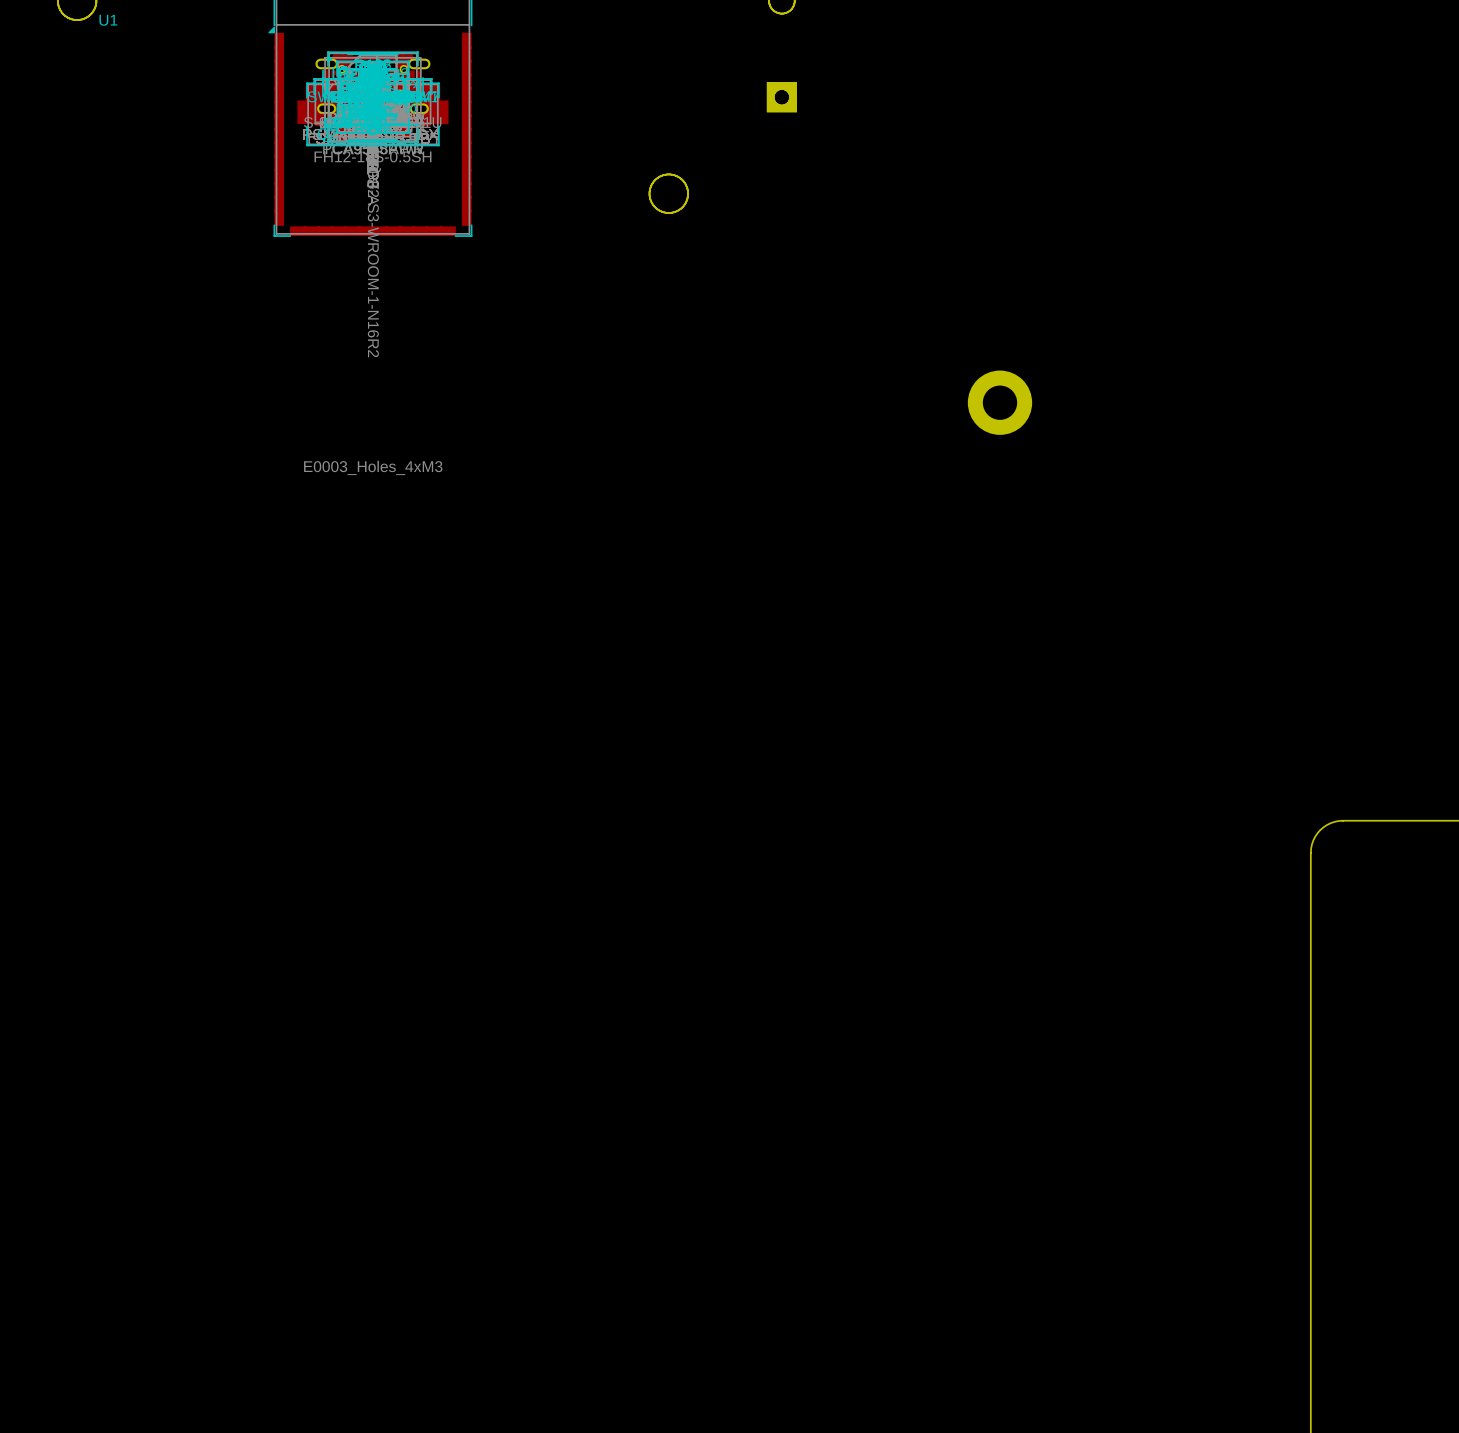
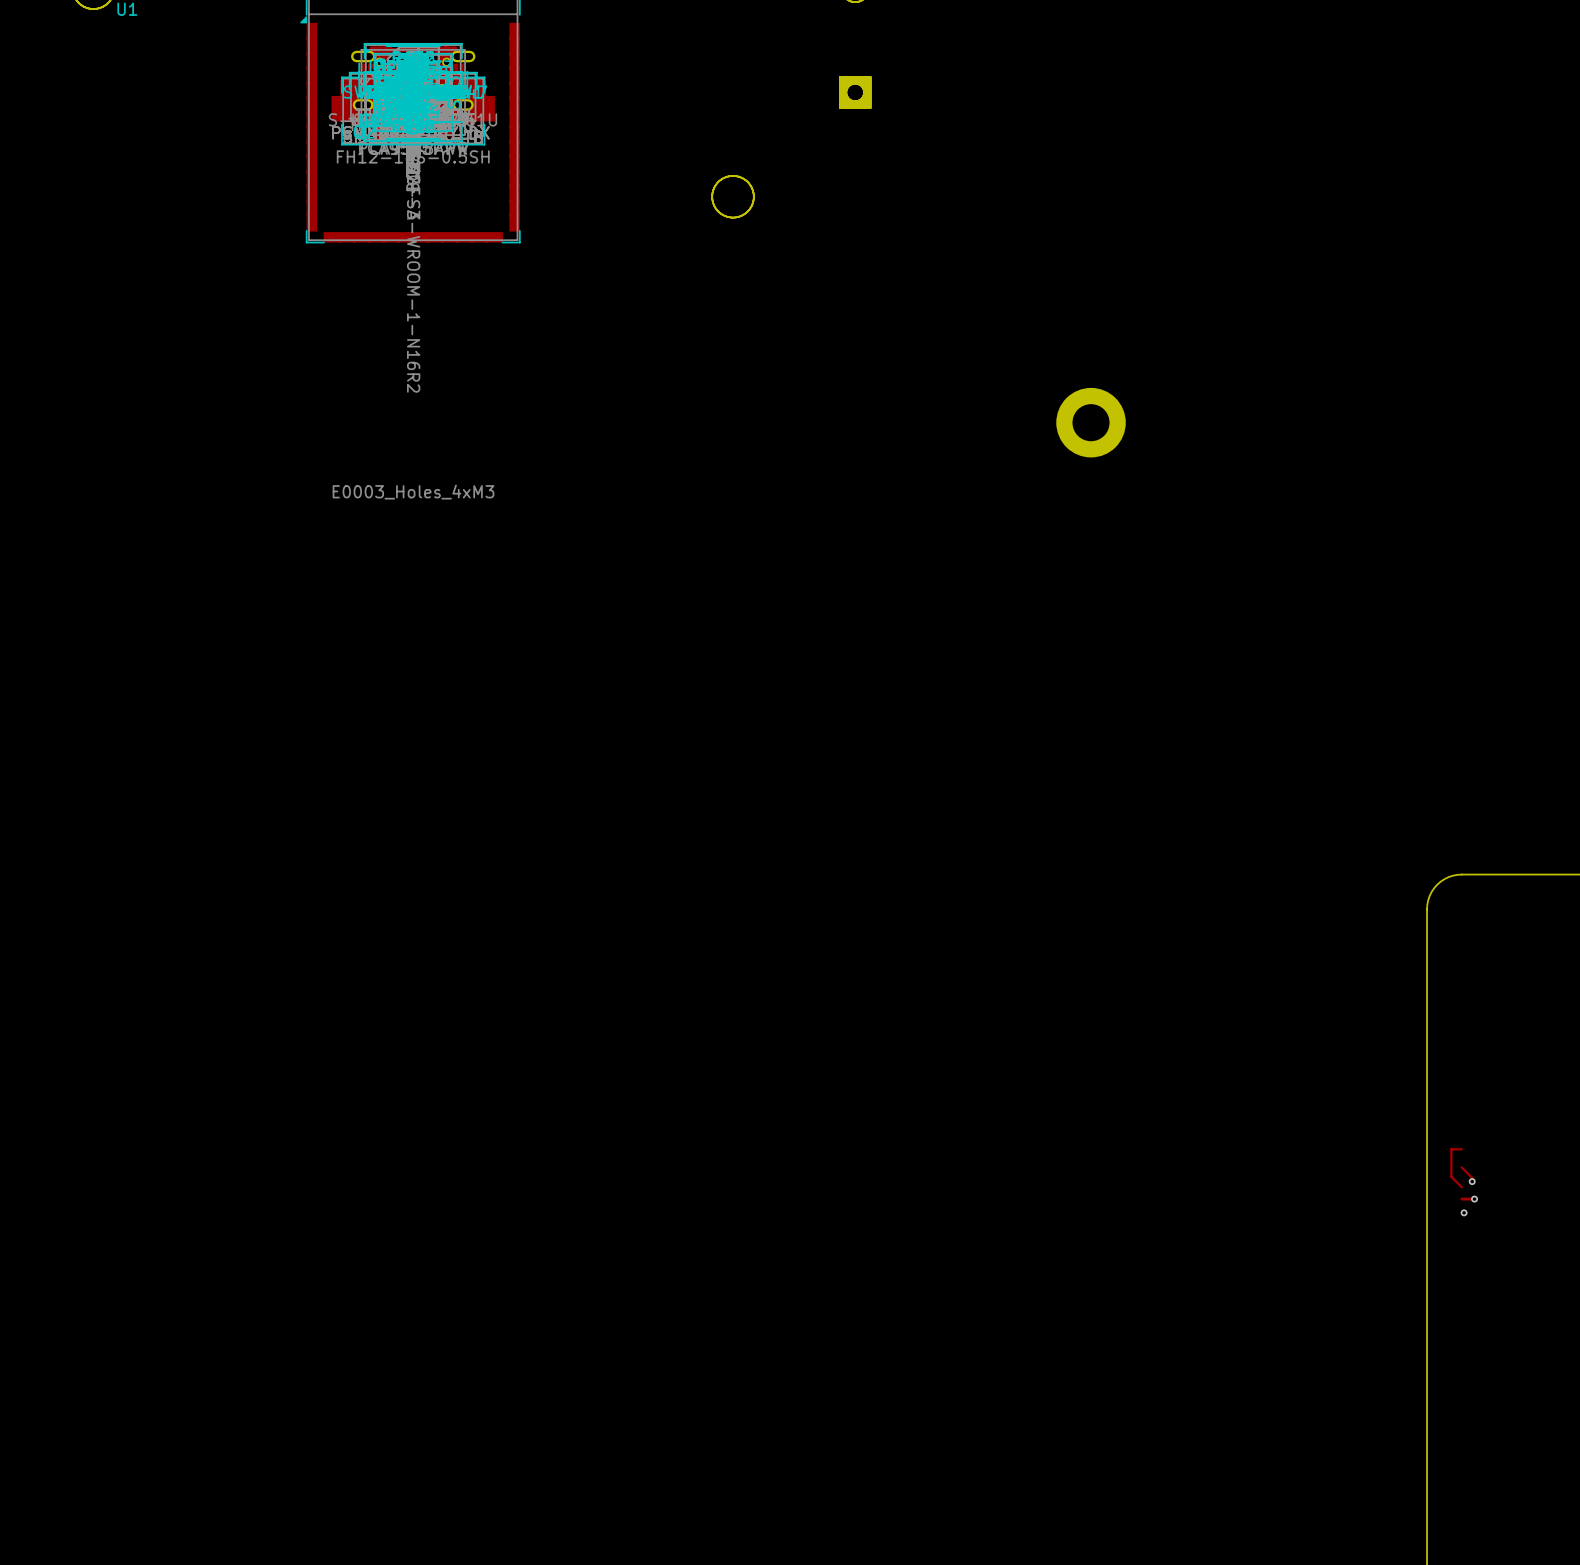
track: none -> (1461, 1149) (1451, 1149) (1451, 1176) (1461, 1187)
track: none -> (1461, 1167) (1472, 1177) (1472, 1181)
via: none -> (1472, 1181)
track: none -> (1461, 1199) (1474, 1199)
via: none -> (1474, 1199)
via: none -> (1464, 1212)

